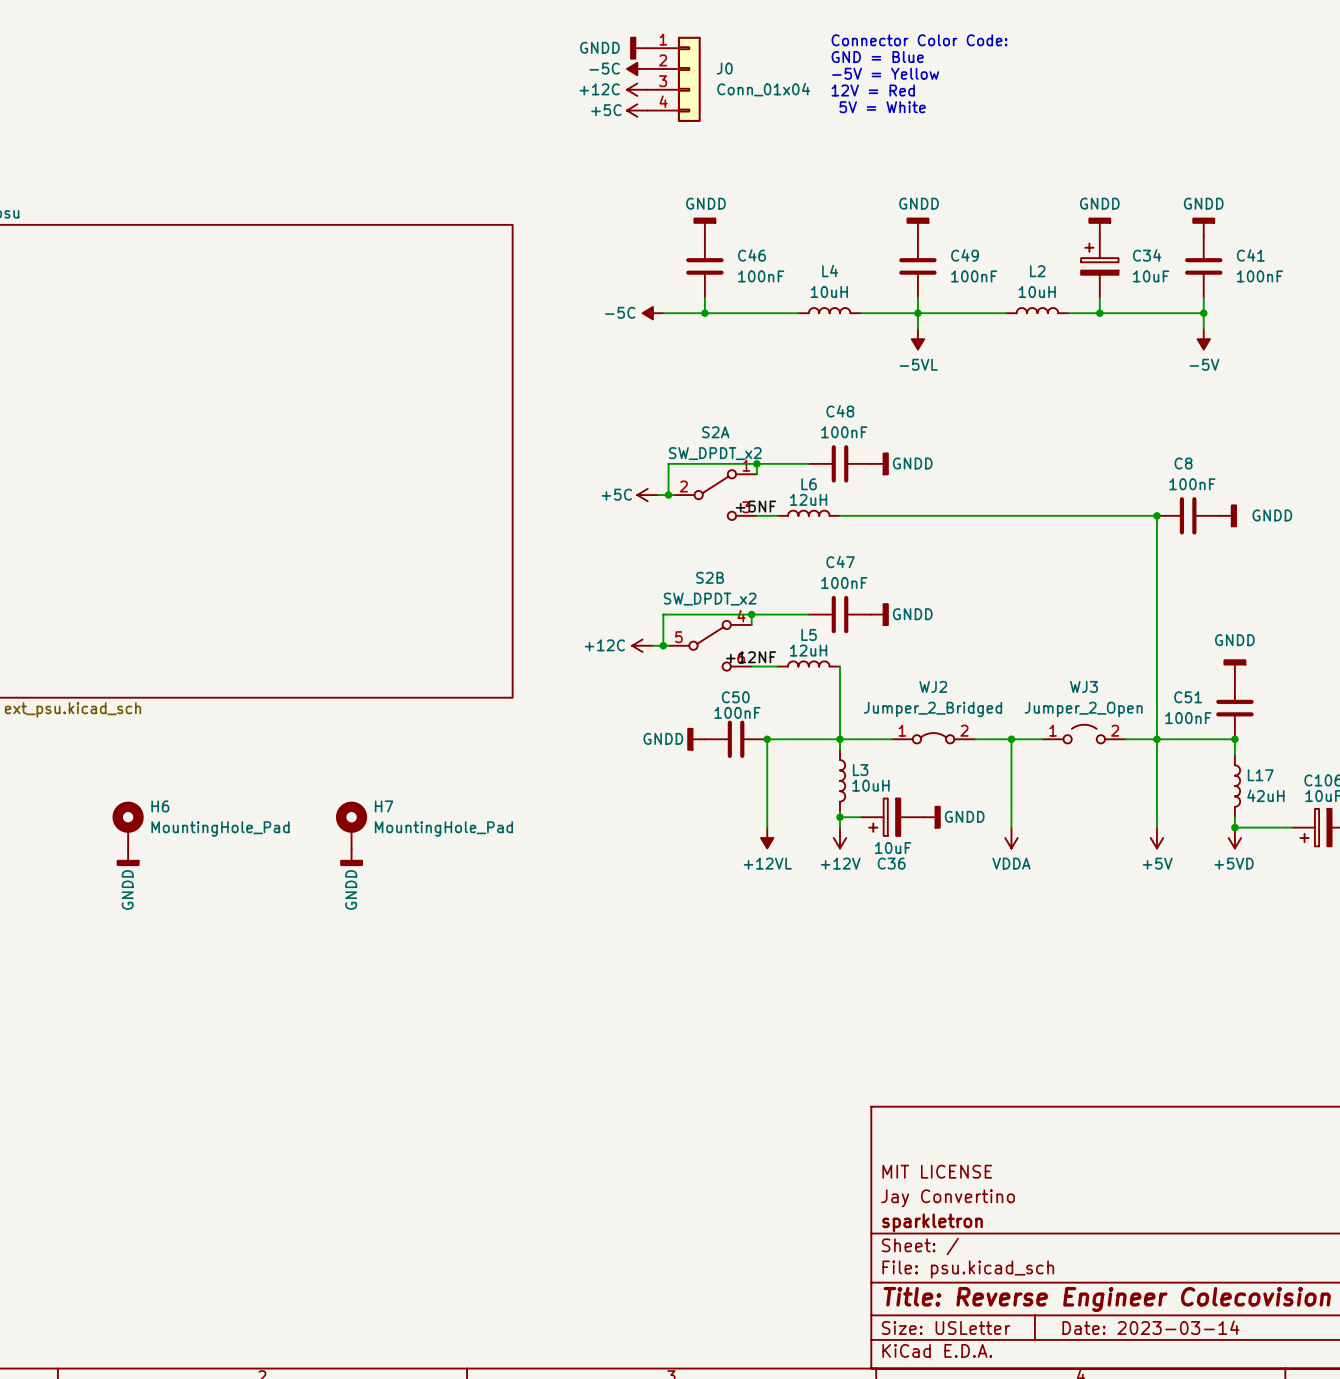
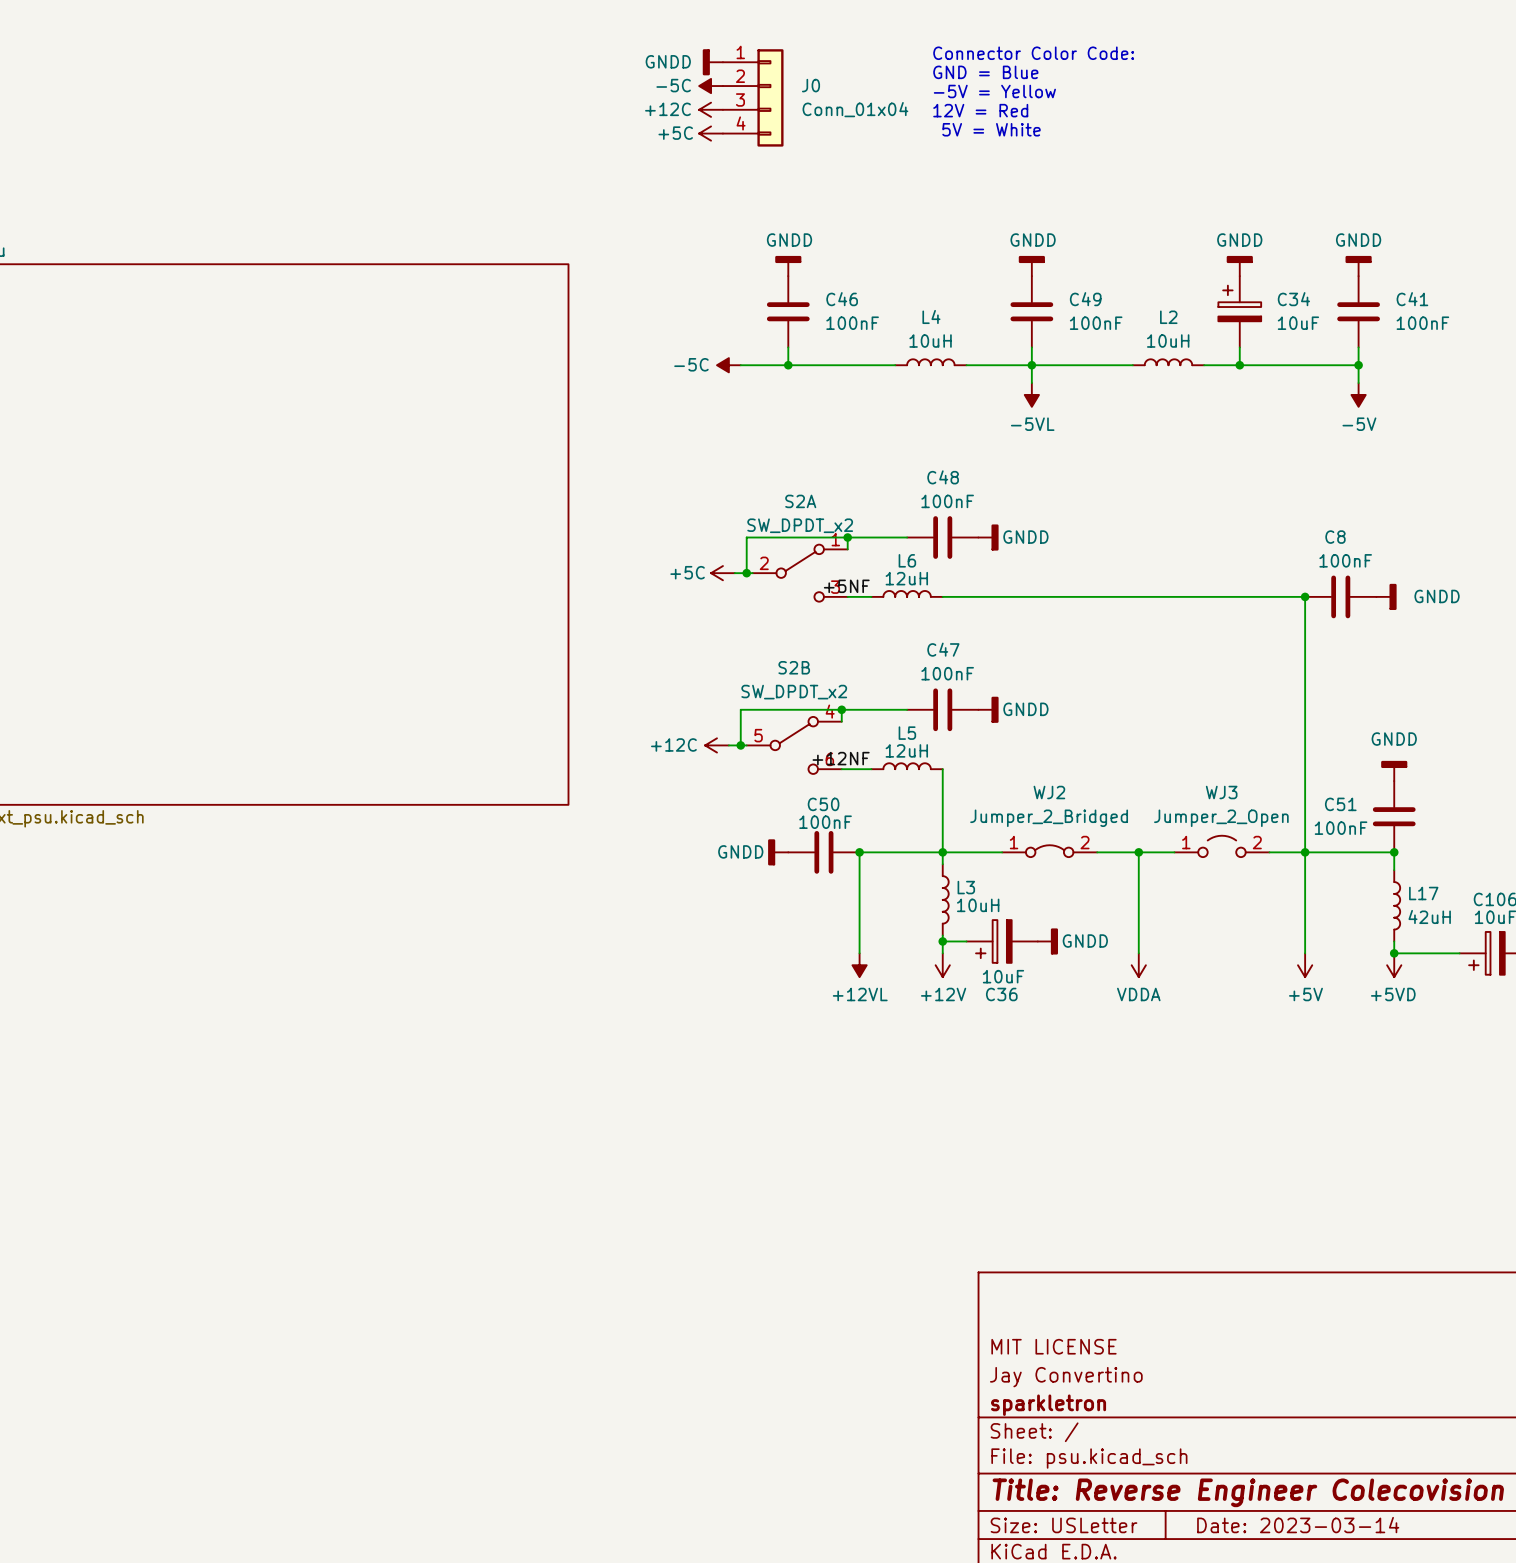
H6: MountingHole_Pad (128, 825) -> none
H7: MountingHole_Pad (351, 825) -> none
power symbol: GNDD (128, 857) -> none
power symbol: GNDD (351, 857) -> none

